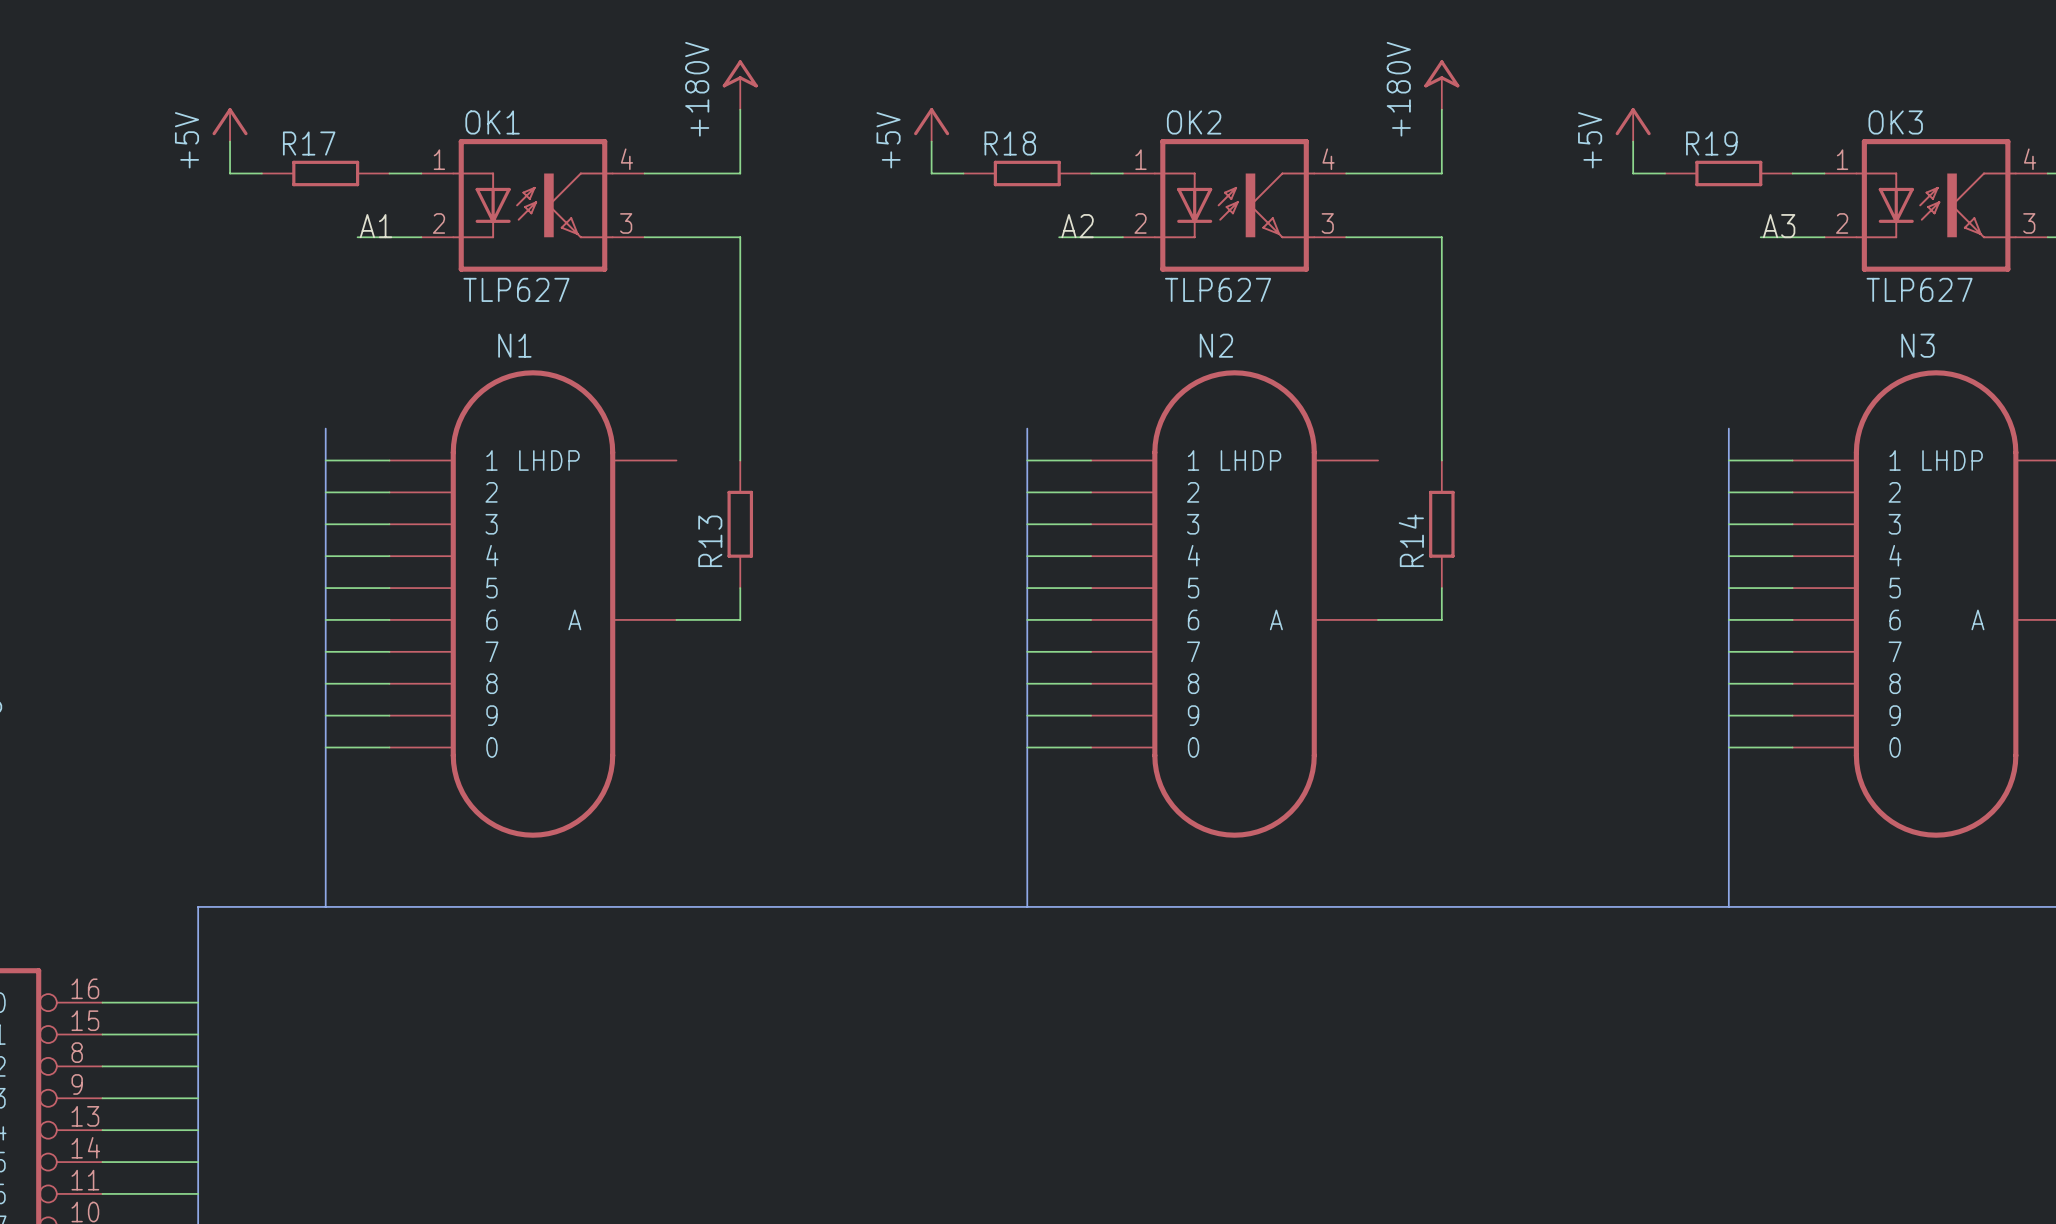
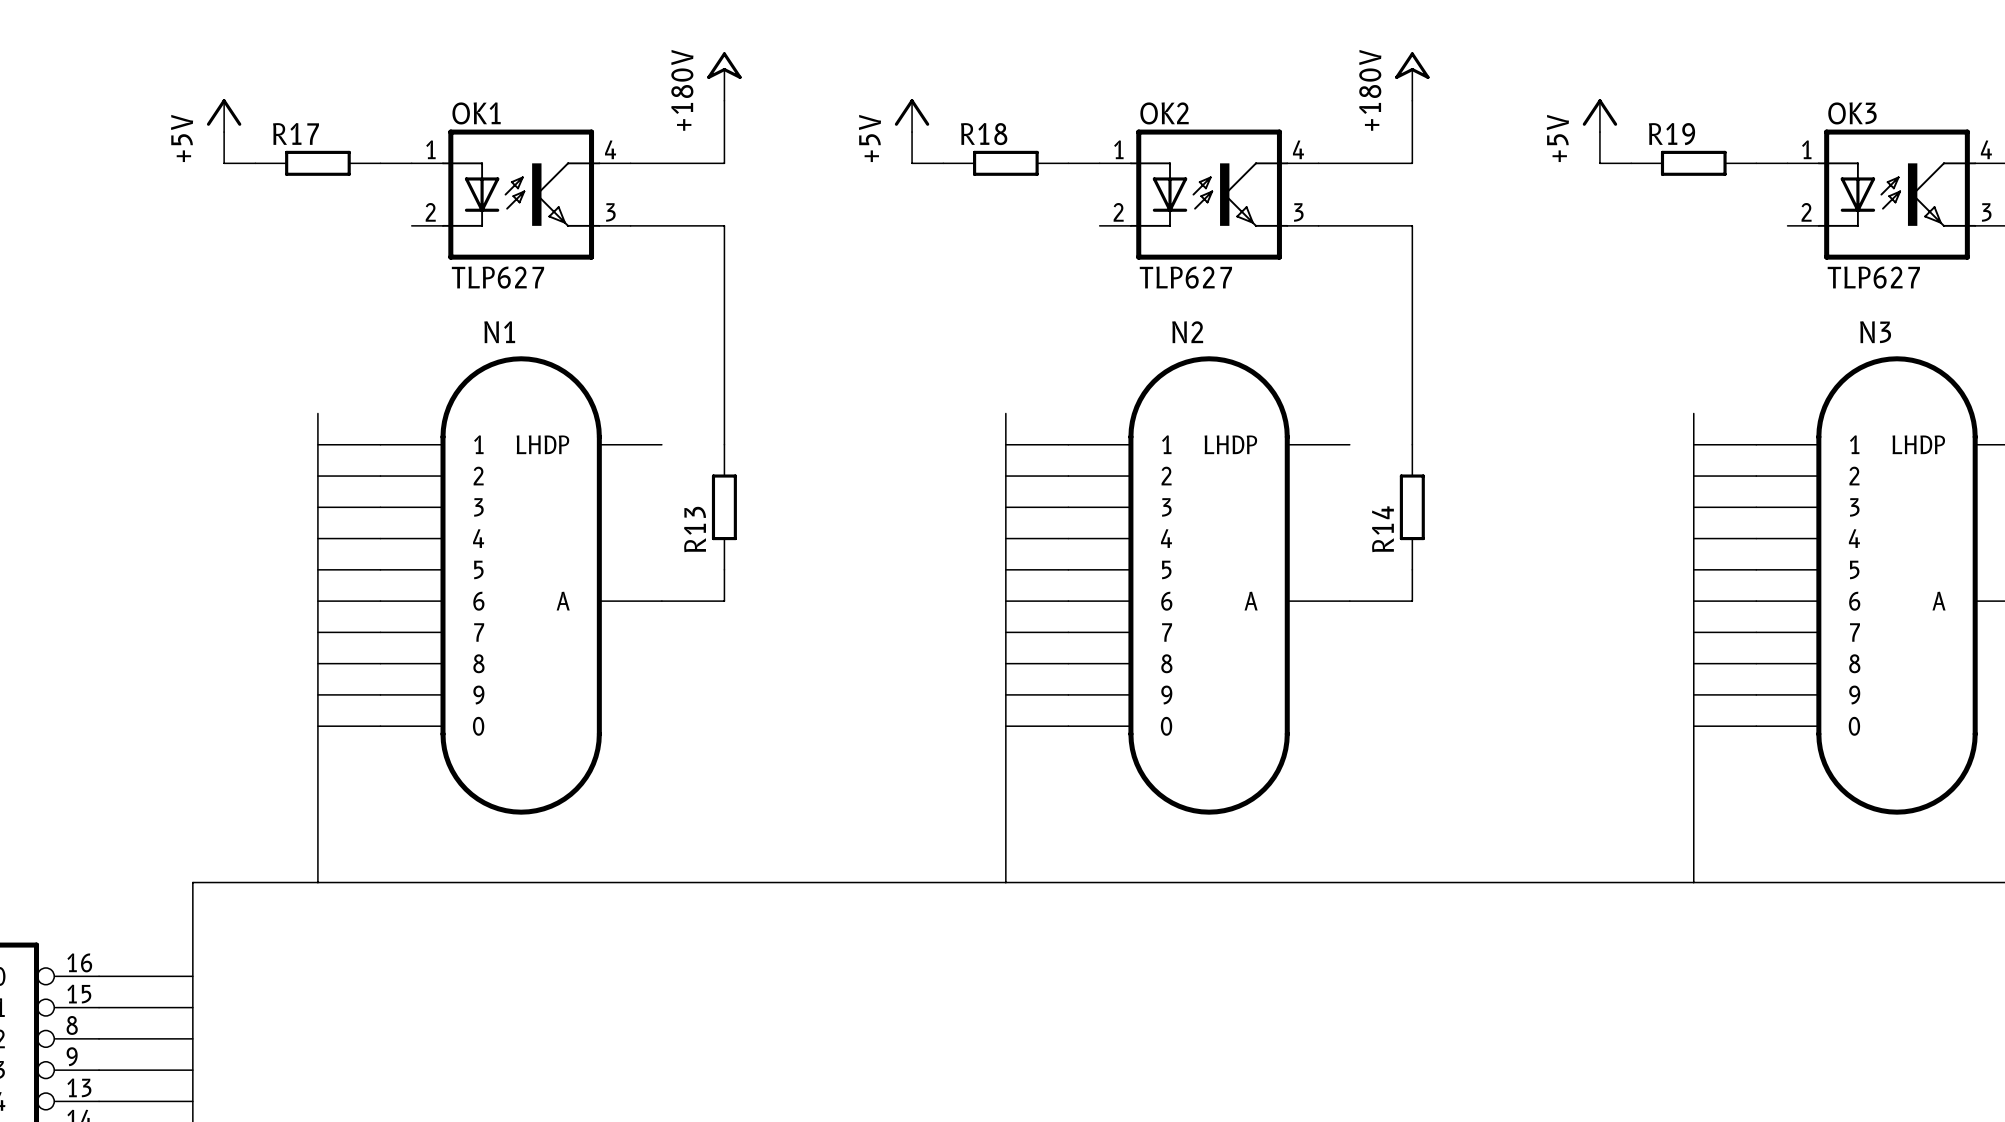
label: A1 (375, 226) -> none
label: A2 (1077, 226) -> none
label: A3 (1779, 226) -> none
wire: (357, 237) (421, 237) -> none
wire: (1059, 237) (1122, 237) -> none
wire: (1760, 237) (1824, 237) -> none

